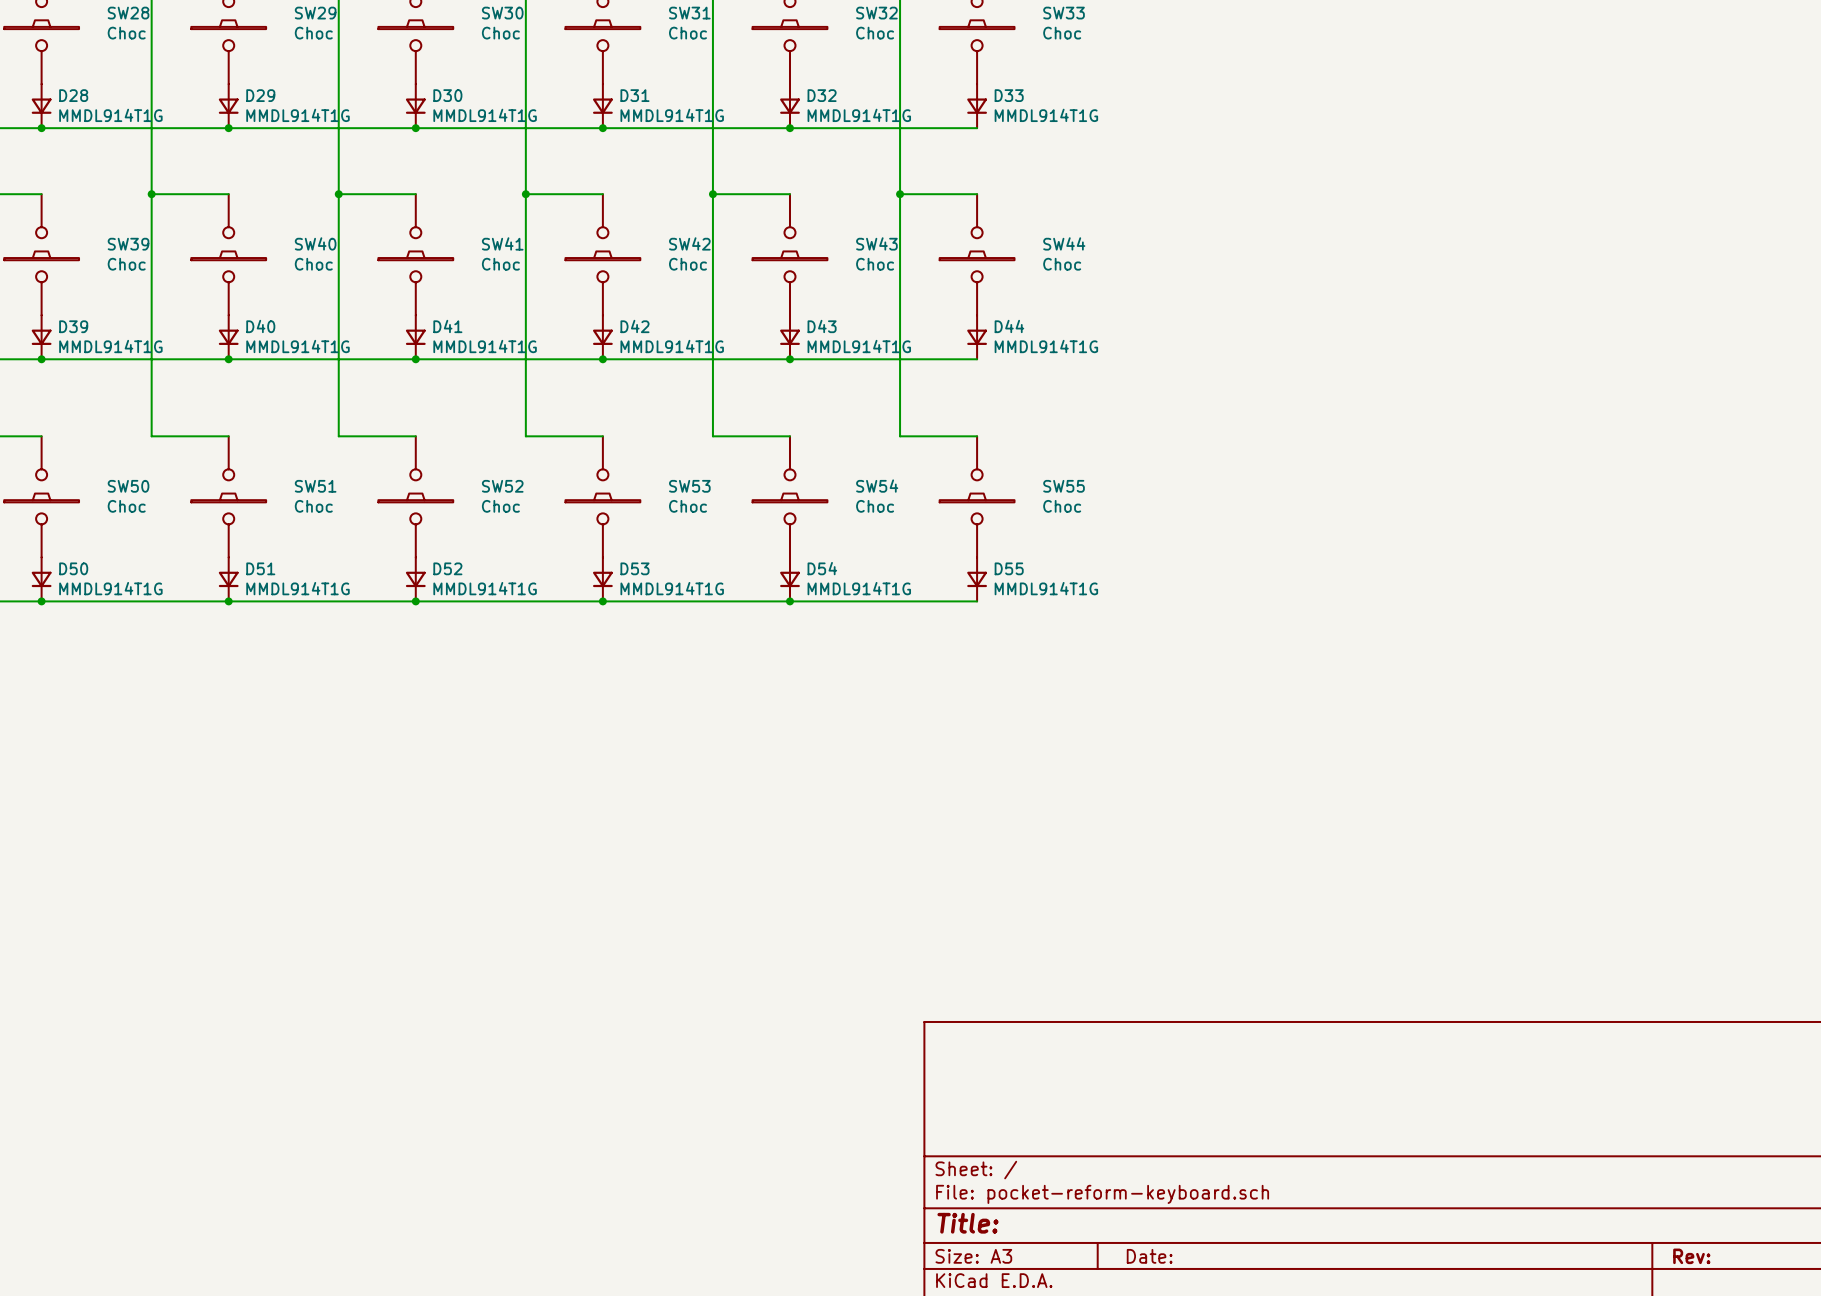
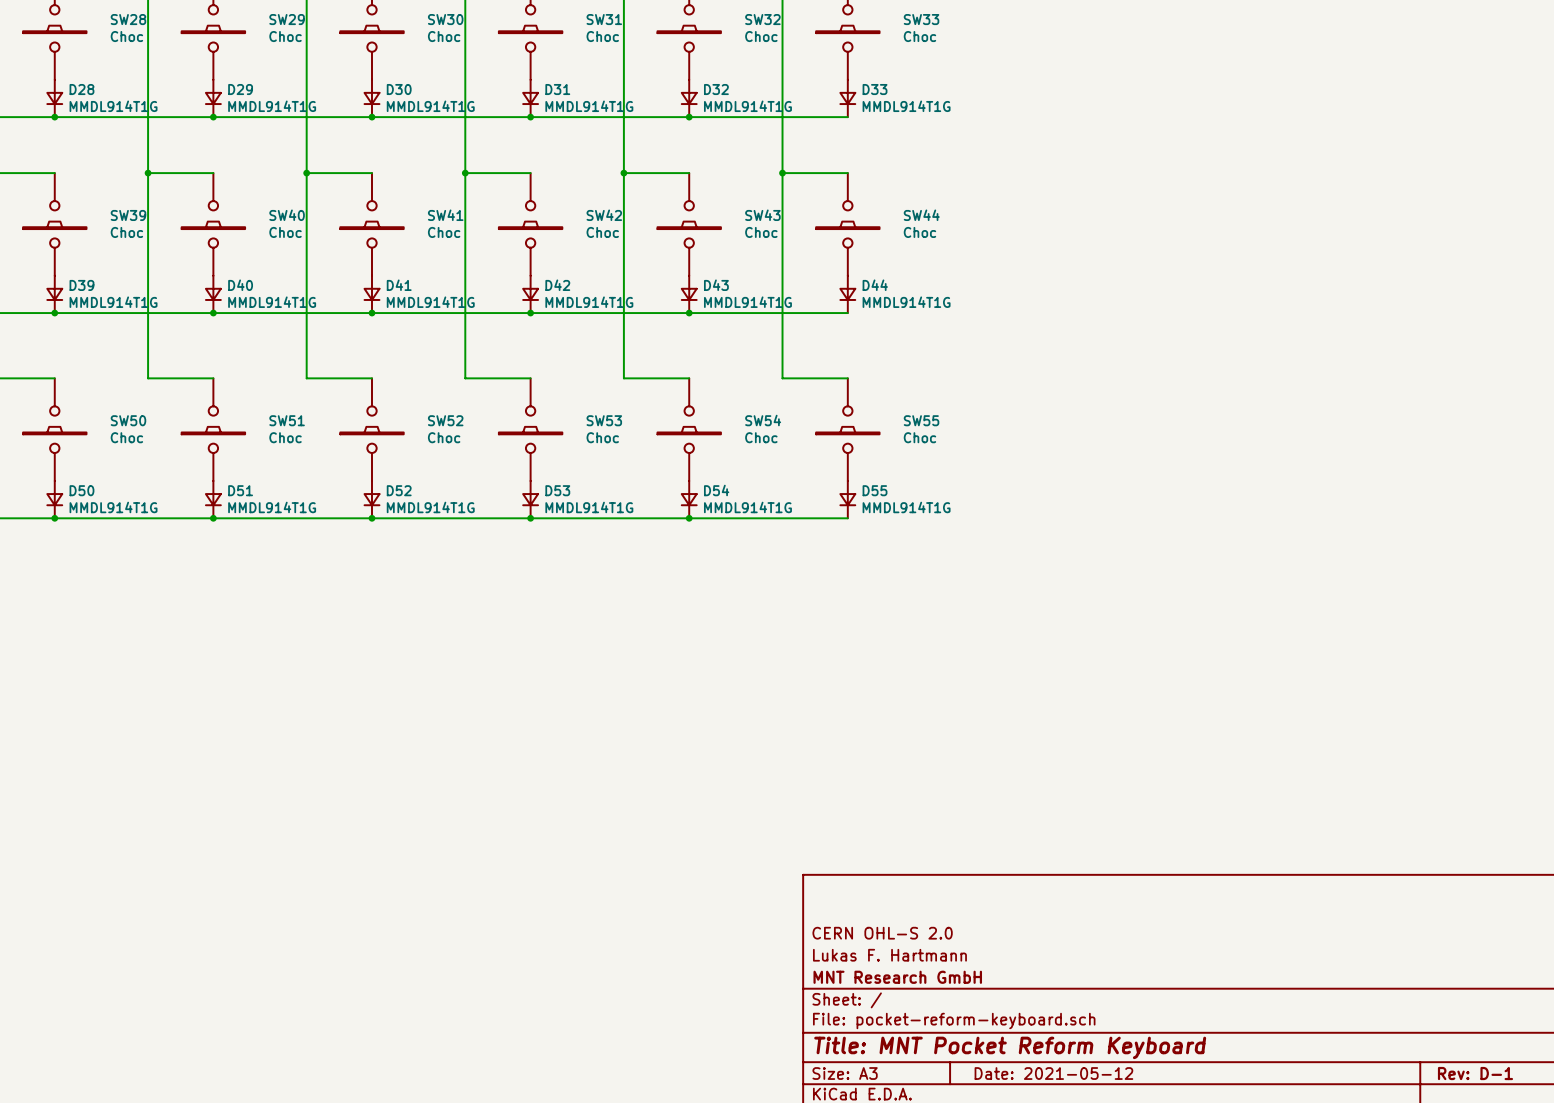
title block: none -> CERN OHL-S 2.0 (882, 933)
title block: none -> Lukas F. Hartmann (889, 955)
title block: none -> MNT Research GmbH (897, 977)
title block: Title: (967, 1223) -> Title: MNT Pocket Reform Keyboard (1010, 1047)
title block: Date: (1149, 1256) -> Date: 2021-05-12 (1053, 1073)
title block: Rev: (1691, 1256) -> Rev: D-1 (1475, 1073)

